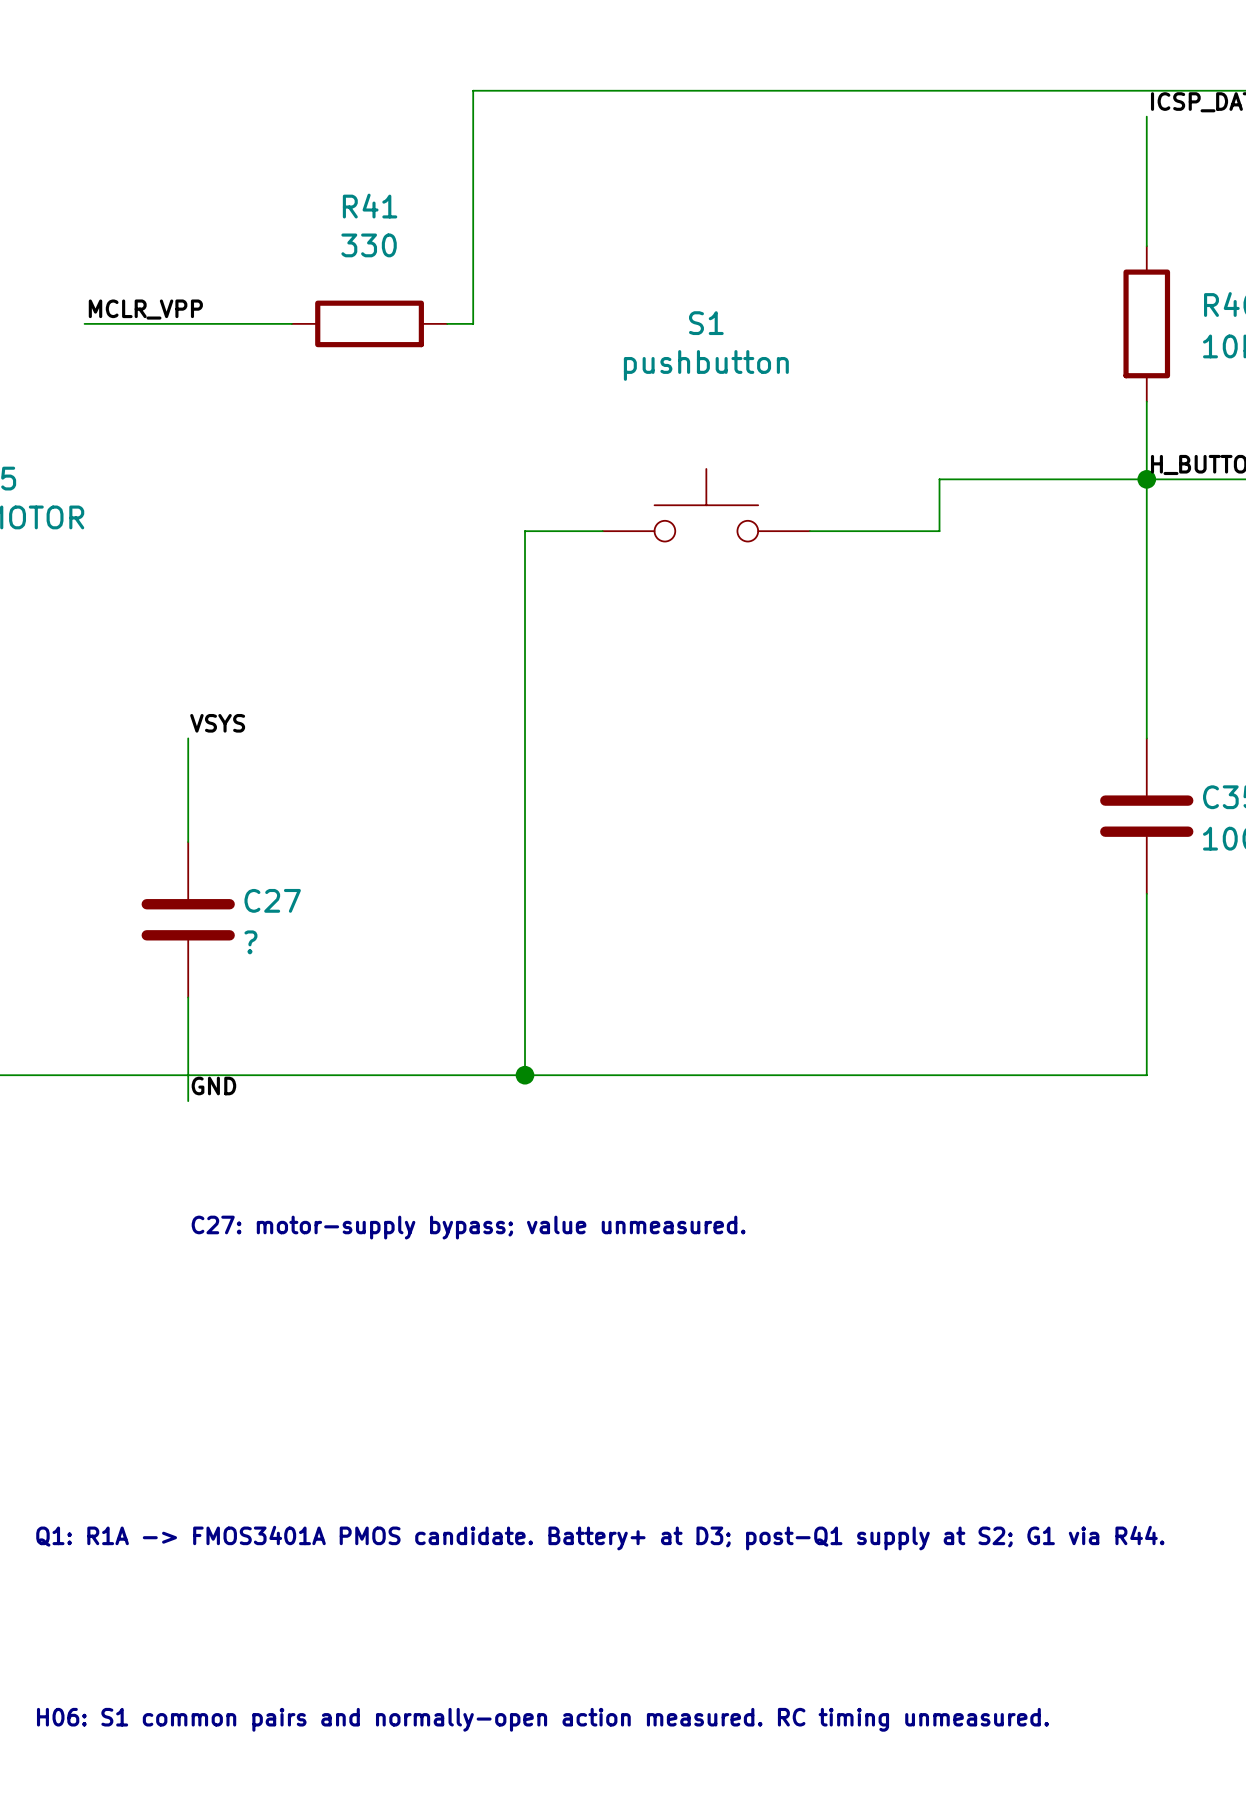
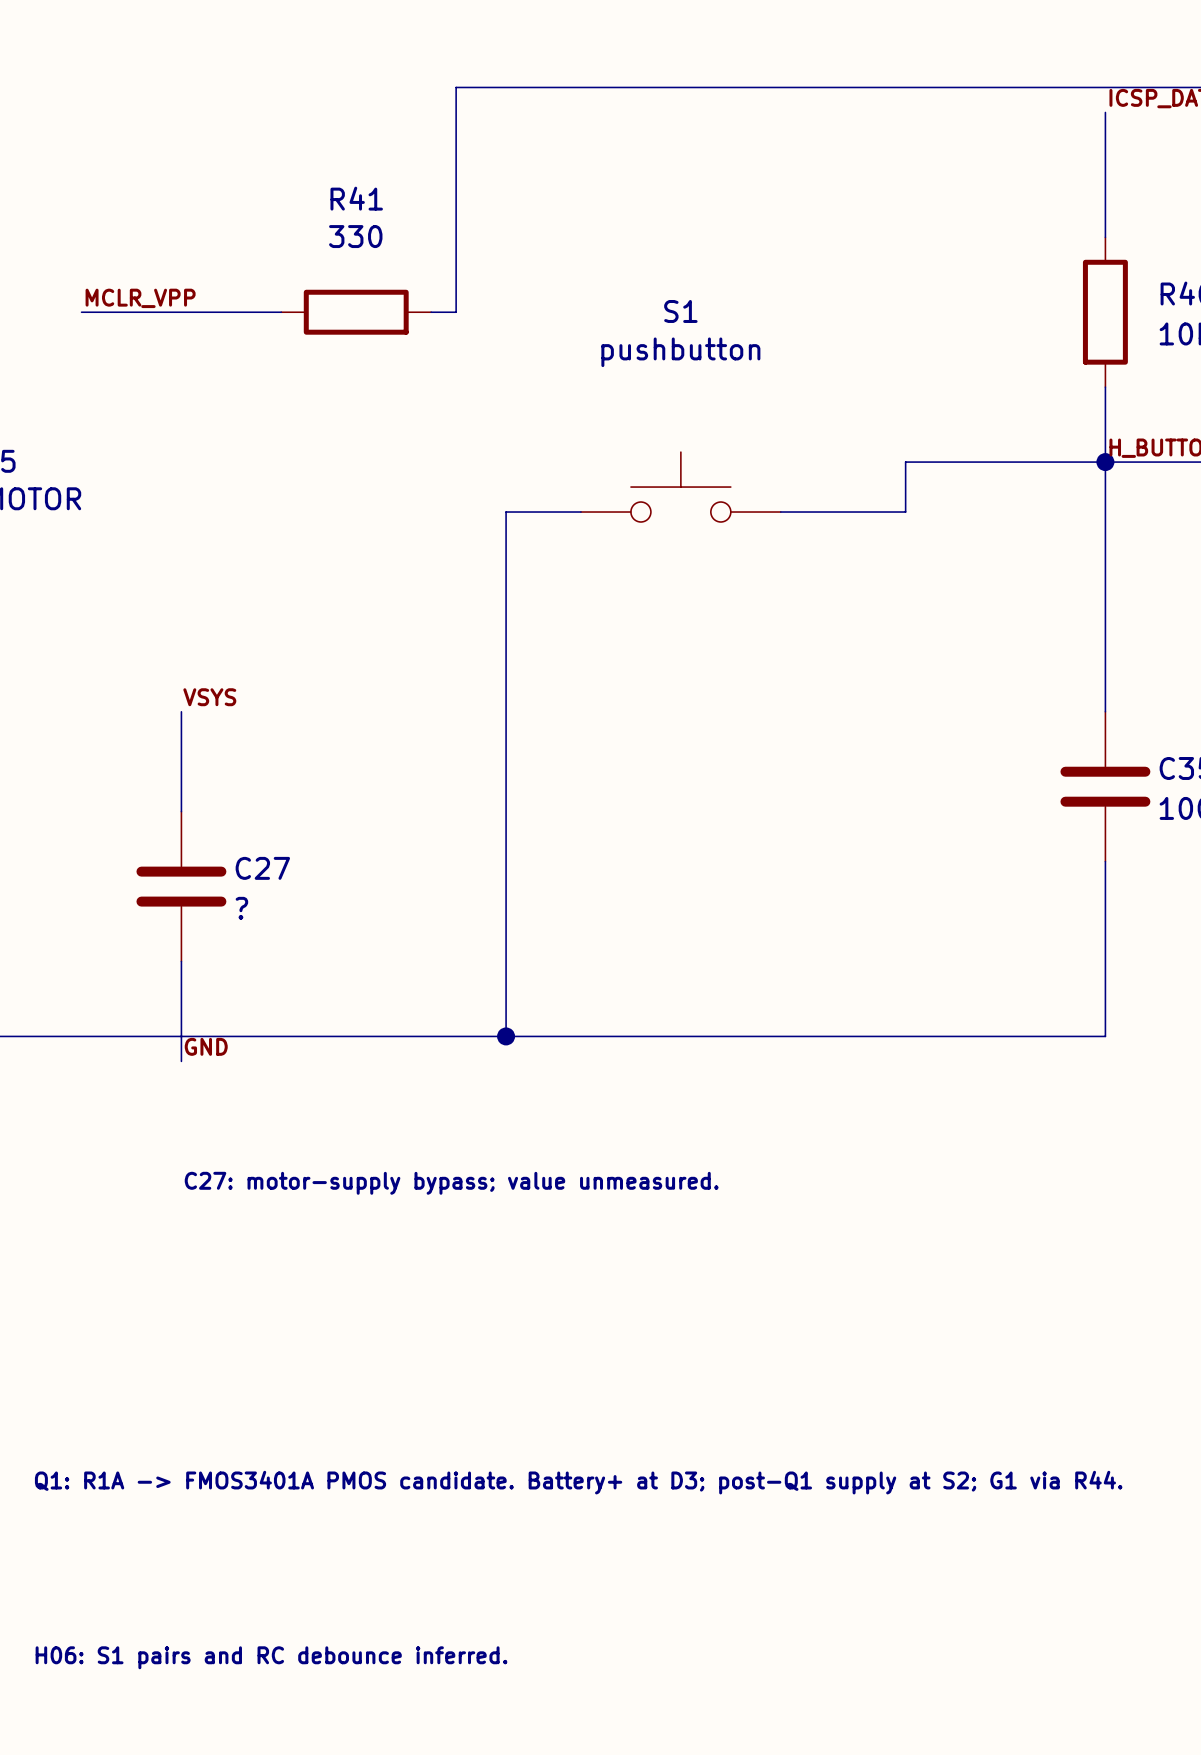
text: H06: S1 common pairs and normally-open action measured. RC timing unmeasured. (542, 1719) -> H06: S1 pairs and RC debounce inferred. (271, 1657)

